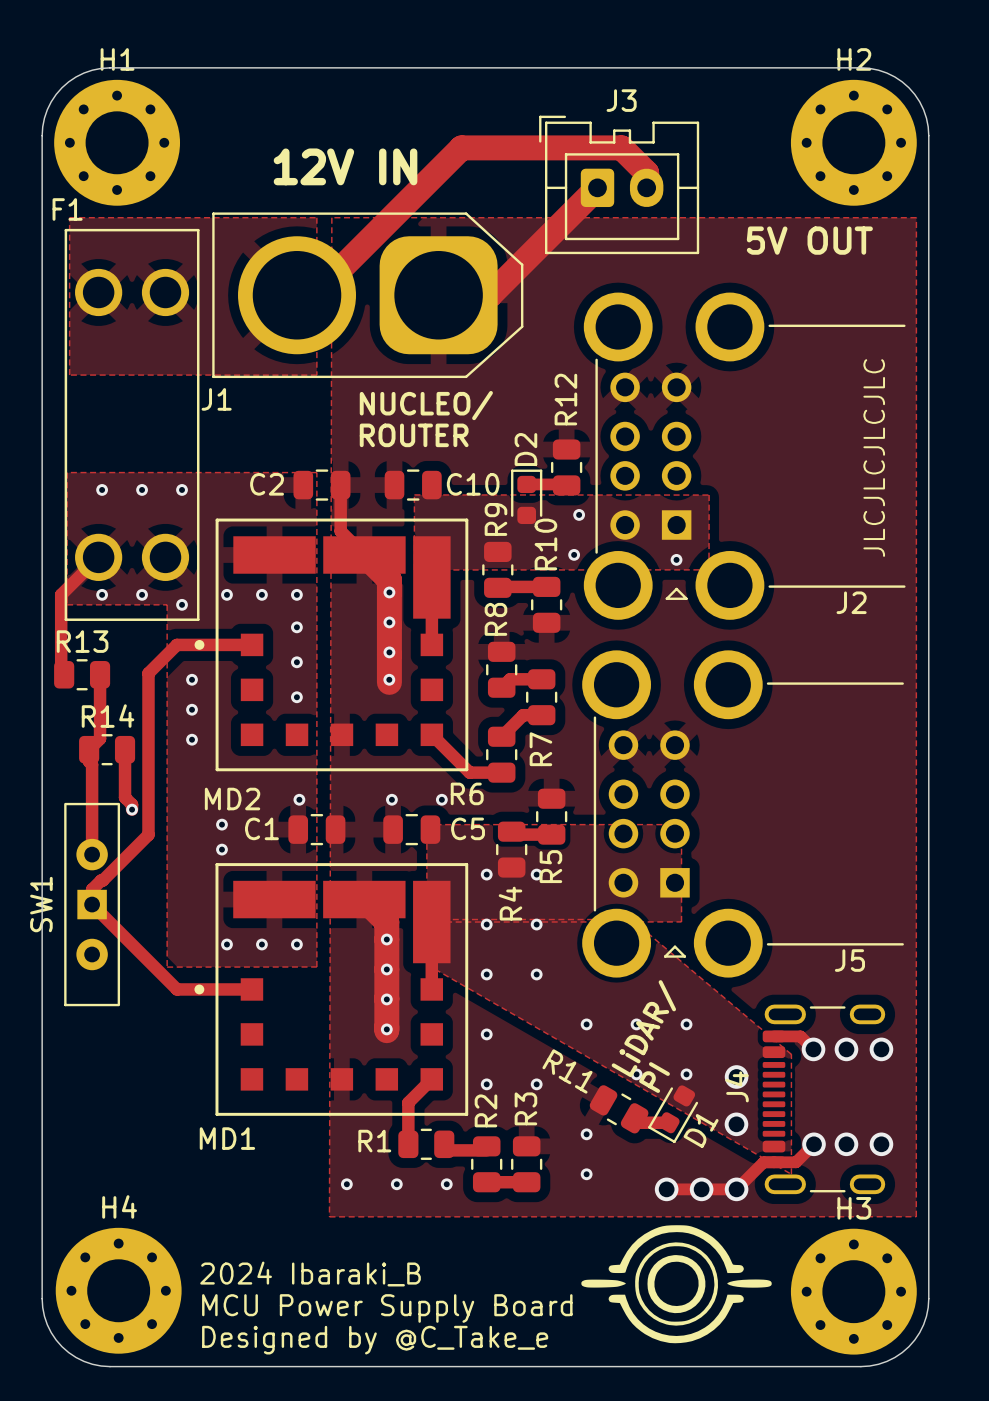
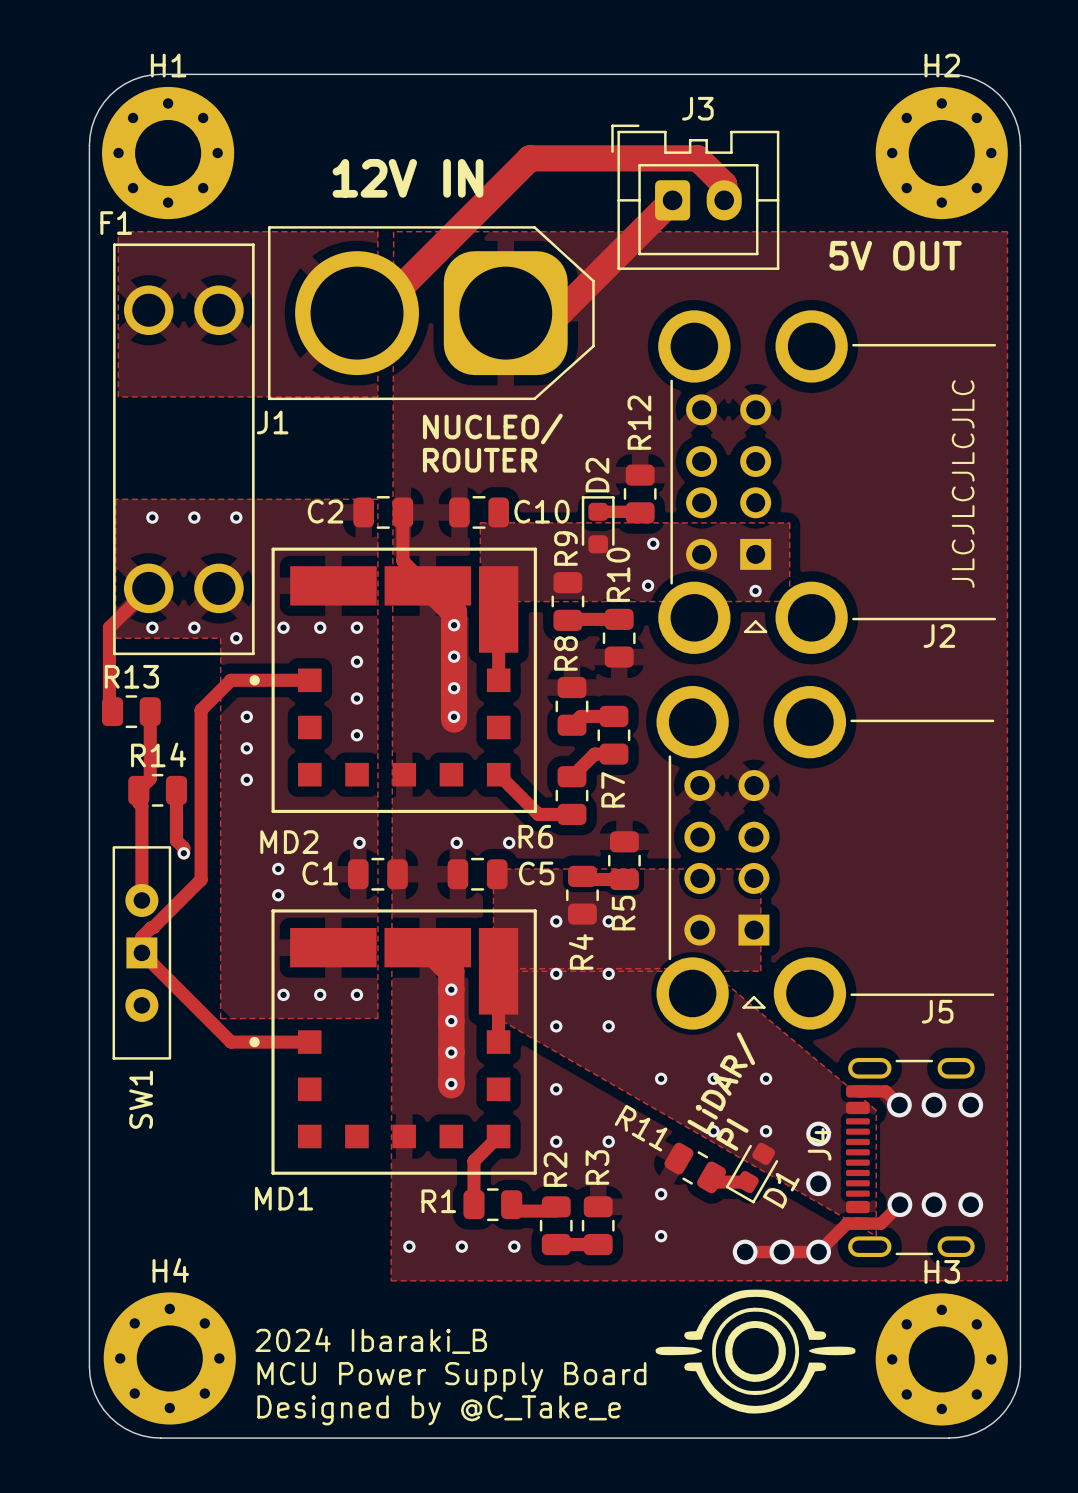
SW1 name position: SW1 (41, 904) -> SW1 (141, 1099)

